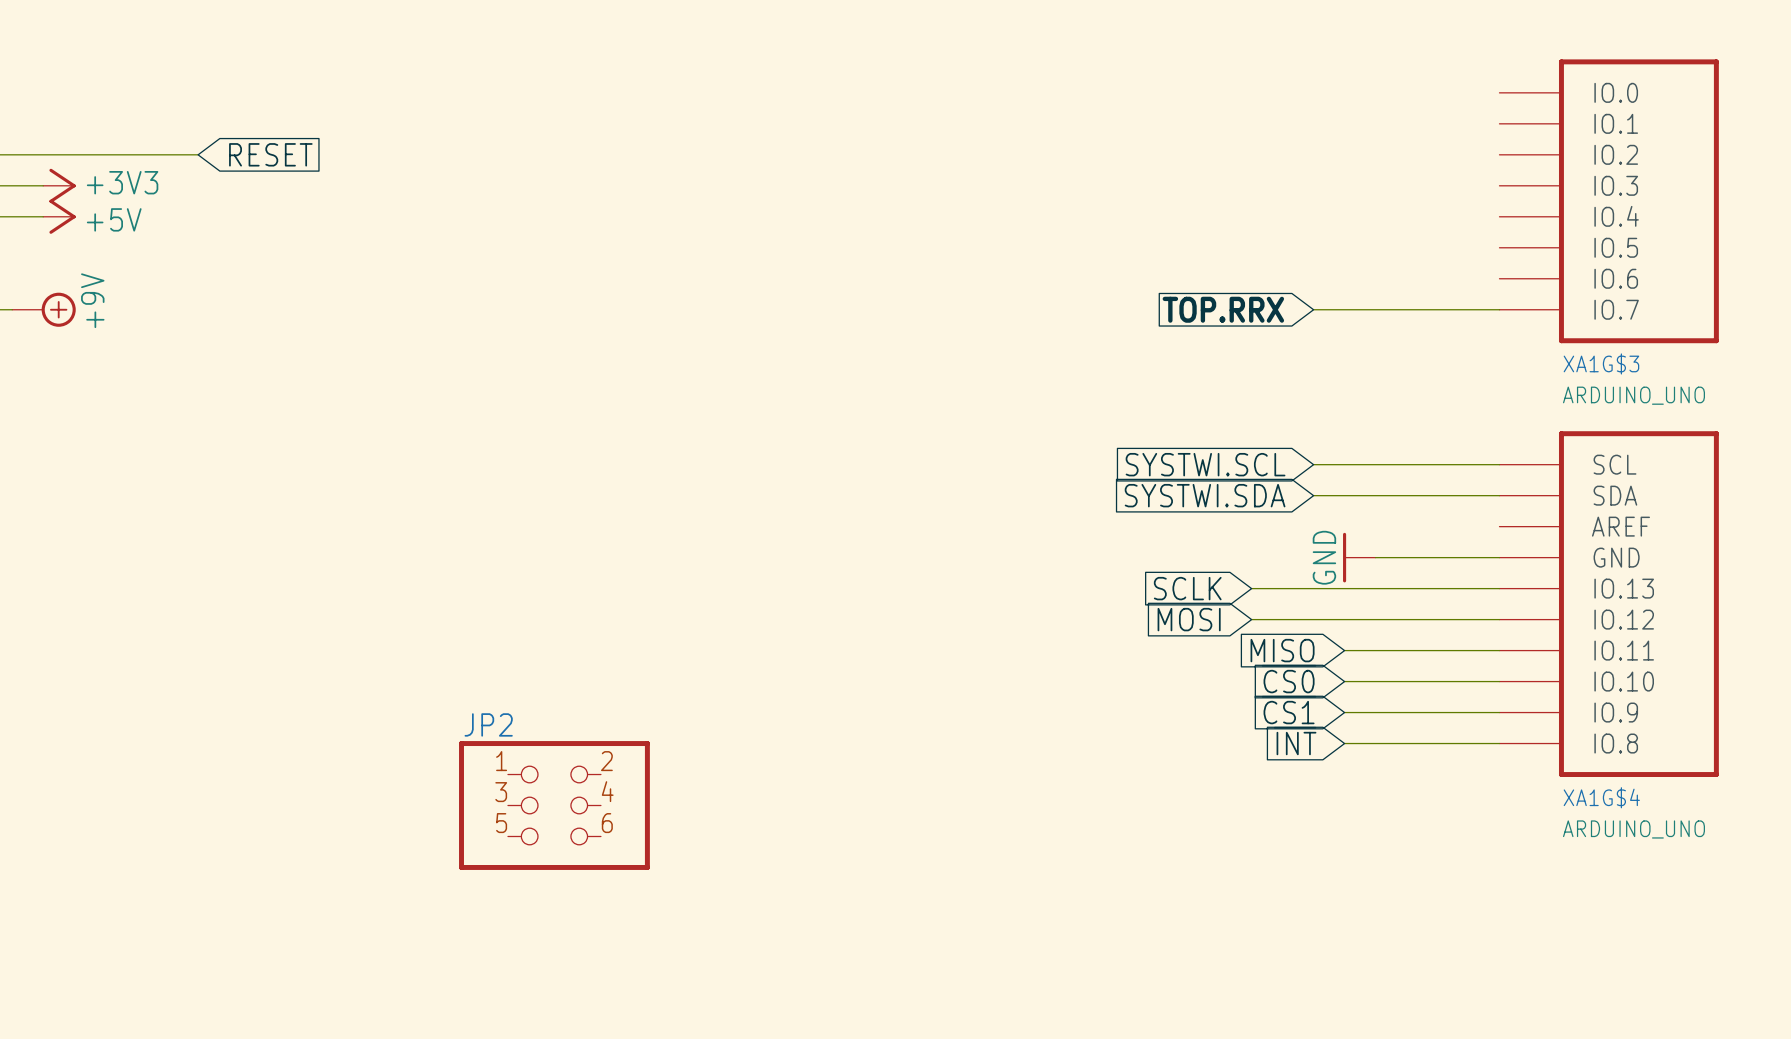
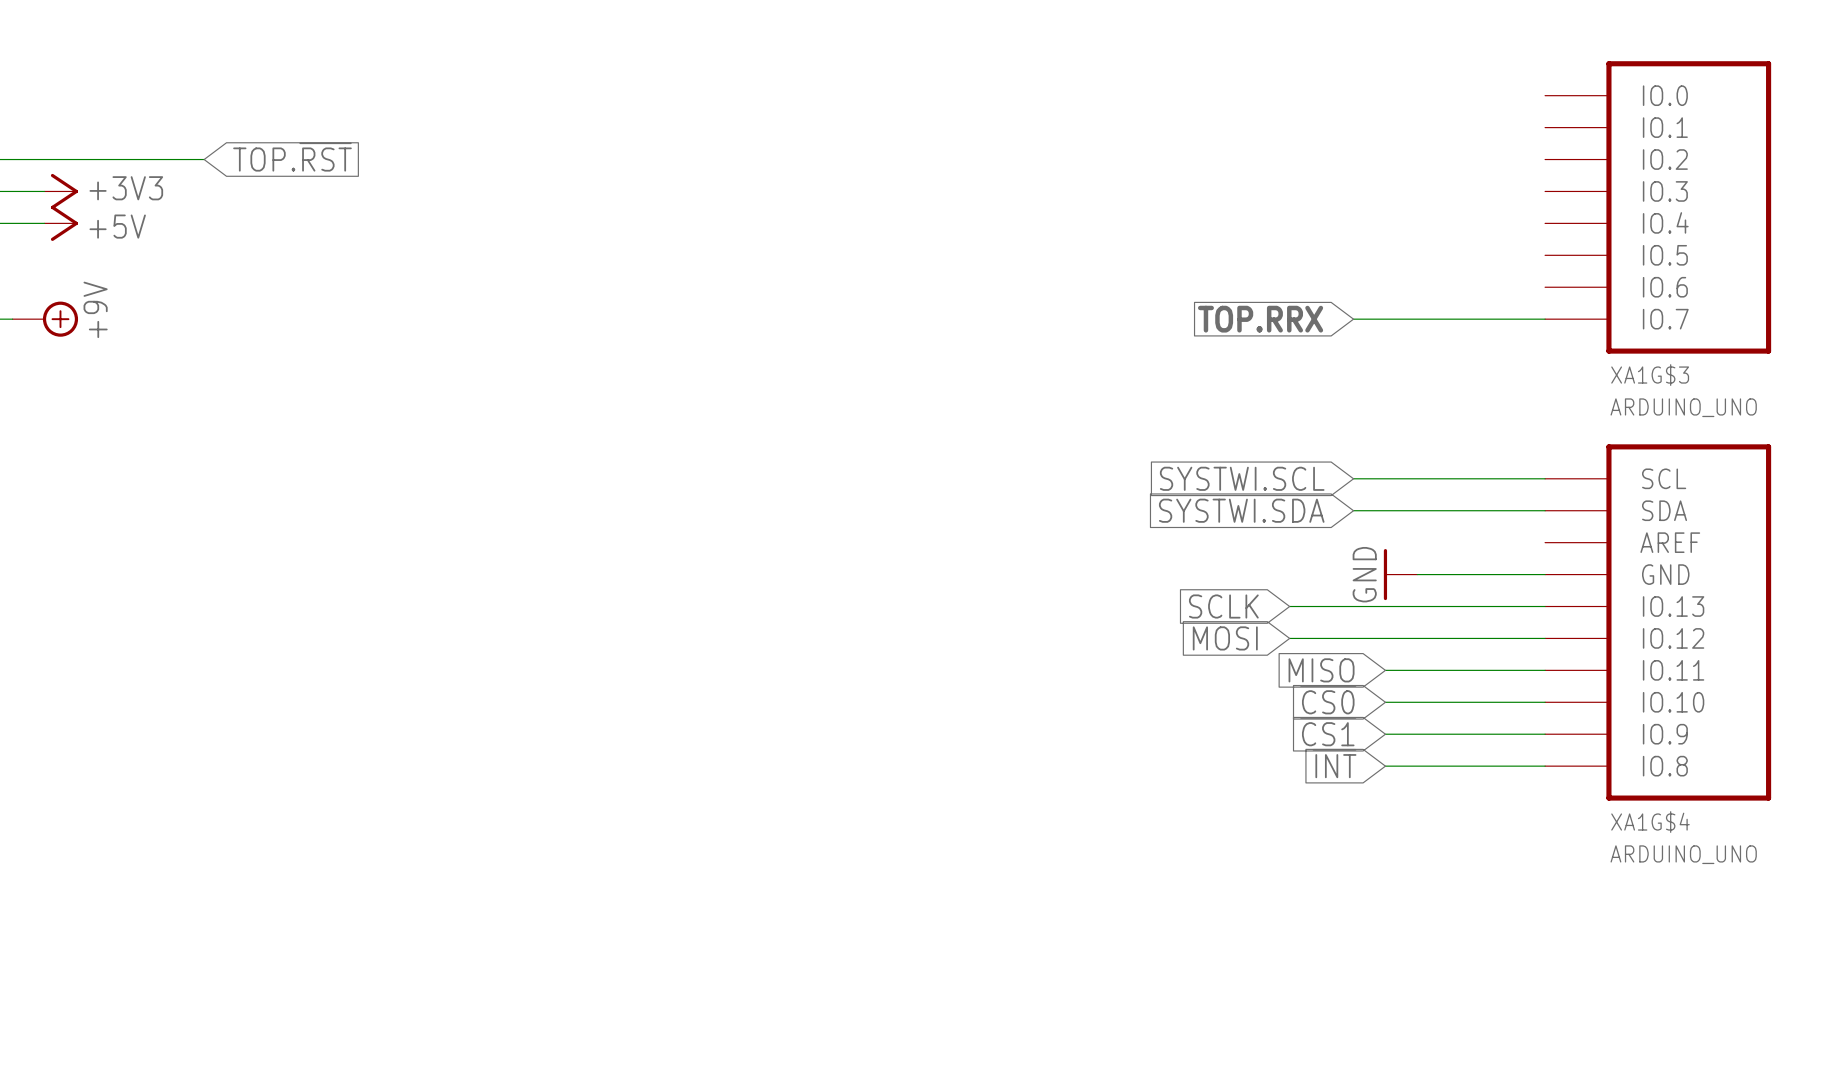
global label: RESET (270, 154) -> TOP.~{RST} (292, 156)
JP2: (554, 805) -> none

